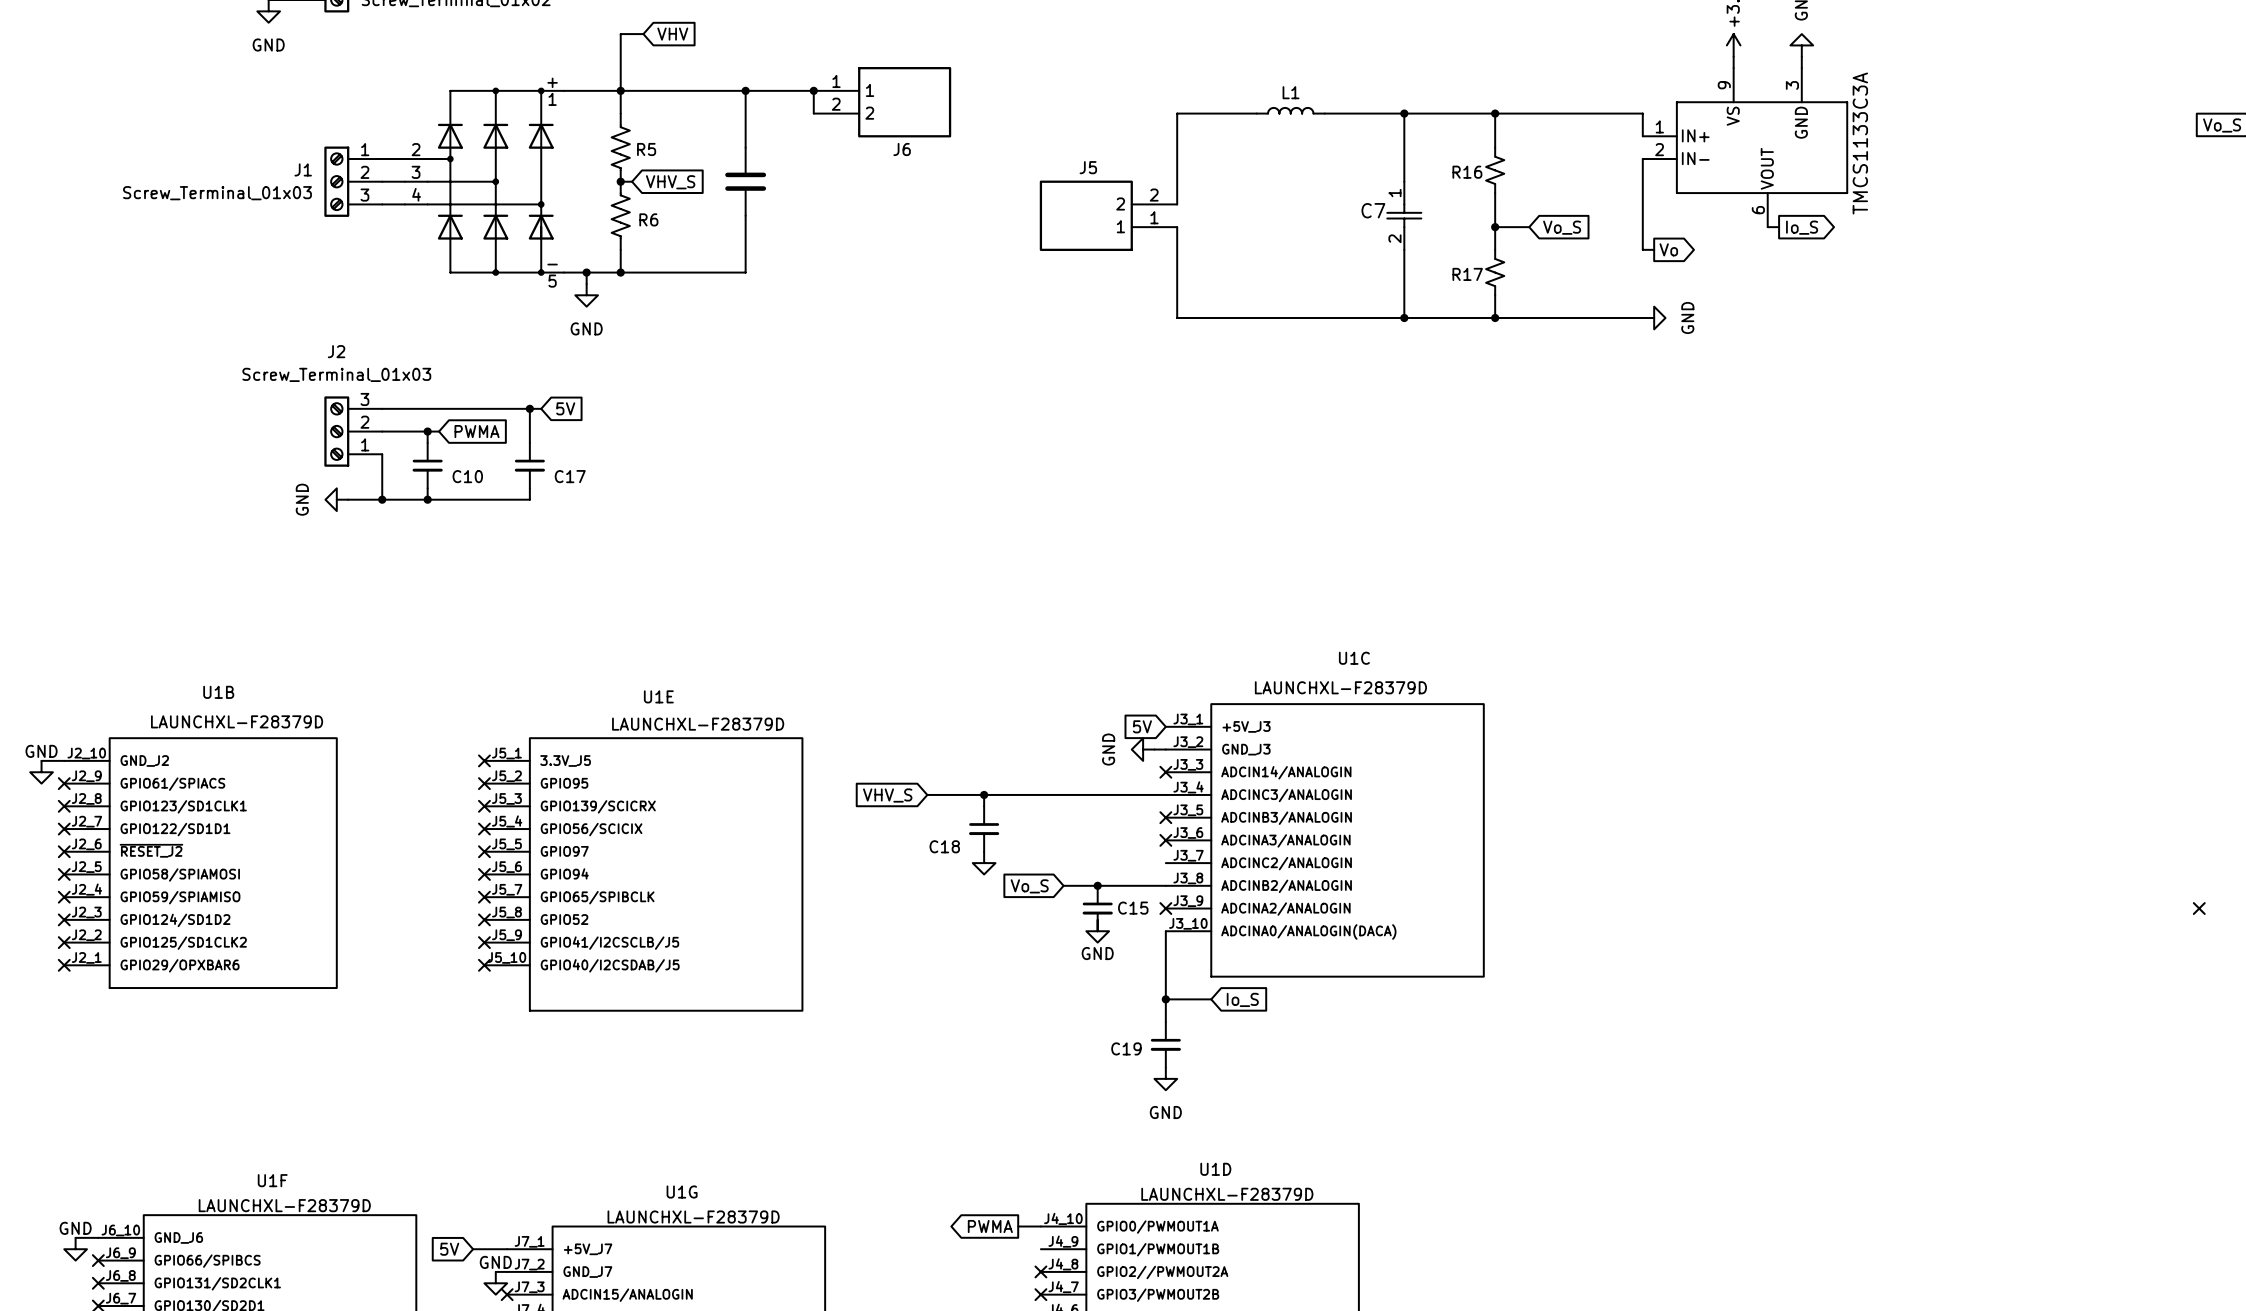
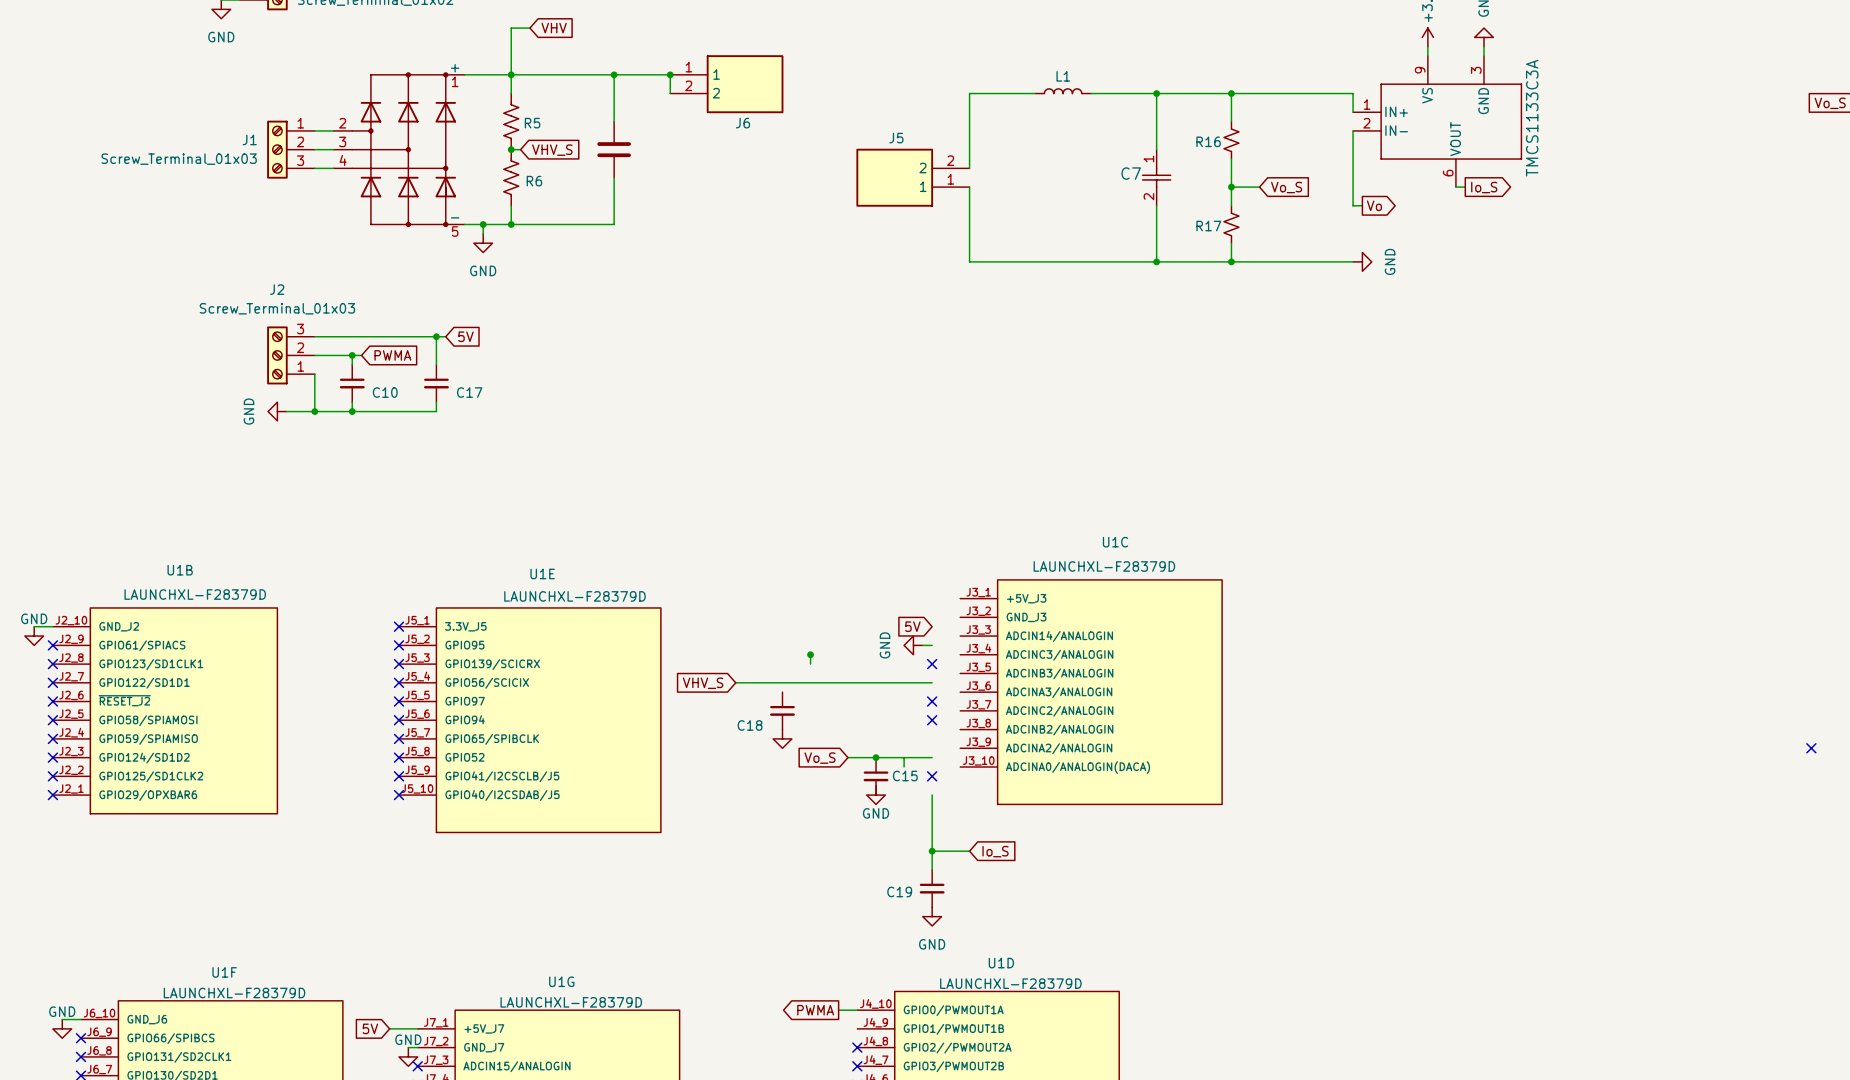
global label position: 5V (1142, 726) -> 5V (912, 626)
power symbol position: GND (1143, 749) -> GND (913, 645)
wire: (1154, 749) (1165, 749) -> (922, 645) (932, 645)
no-connect mark: (1165, 772) -> none
wire: (927, 794) (1165, 794) -> (735, 682) (932, 682)
global label position: VHV_S (887, 795) -> VHV_S (703, 683)
no-connect mark: none -> (932, 664)
no-connect mark: (1165, 817) -> none
C18 position: (984, 829) -> (782, 710)
no-connect mark: (1165, 840) -> none
no-connect mark: none -> (932, 701)
power symbol position: (984, 863) -> (782, 738)
no-connect mark: none -> (932, 720)
wire: (1063, 885) (1165, 885) -> (847, 757) (932, 757)
junction position: (1097, 885) -> (876, 757)
global label position: Vo_S (1029, 886) -> Vo_S (820, 758)
C15 position: (1097, 908) -> (876, 776)
no-connect mark: (1165, 908) -> none
power symbol position: GND (1097, 931) -> GND (876, 795)
wire: (1165, 931) (1165, 1022) -> (932, 795) (932, 869)
no-connect mark: none -> (932, 776)
wire: (1165, 999) (1211, 999) -> (932, 851) (969, 851)
junction position: (1165, 999) -> (932, 851)
global label position: Io_S (1242, 999) -> Io_S (995, 851)
C19 position: (1165, 1044) -> (932, 888)
power symbol position: GND (1165, 1078) -> GND (932, 916)

